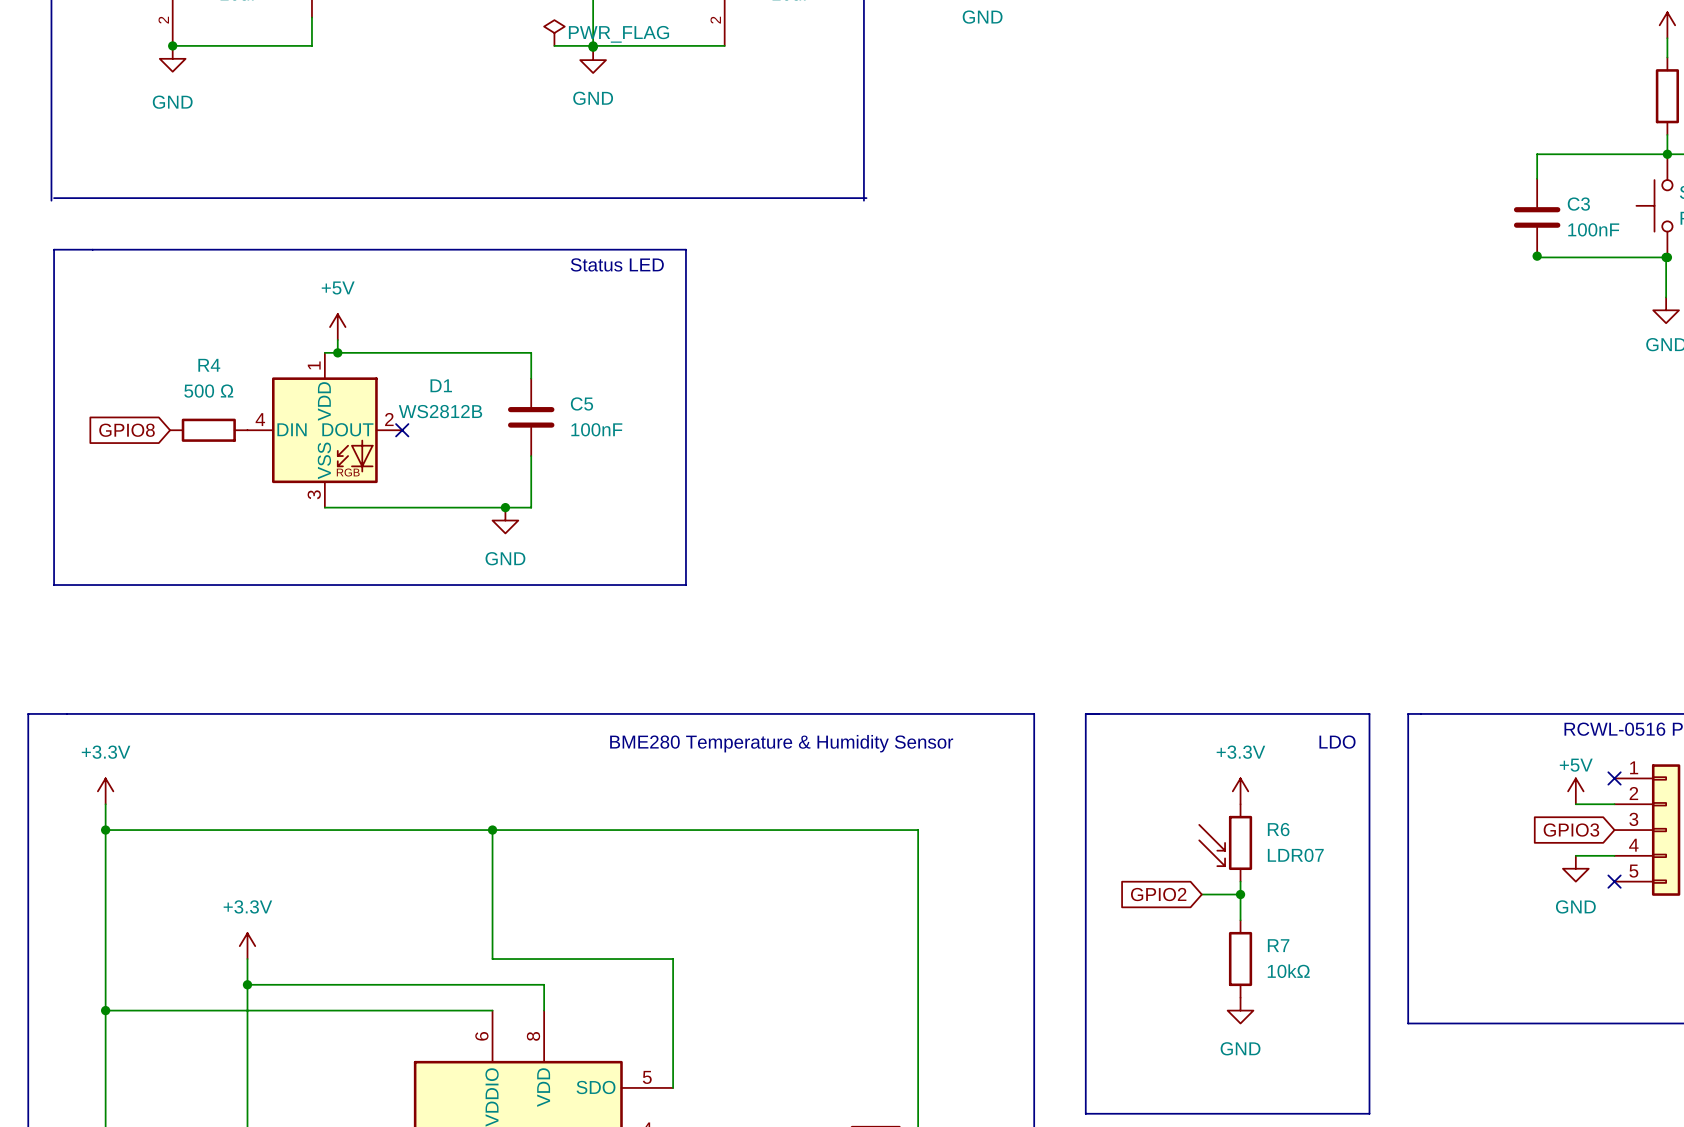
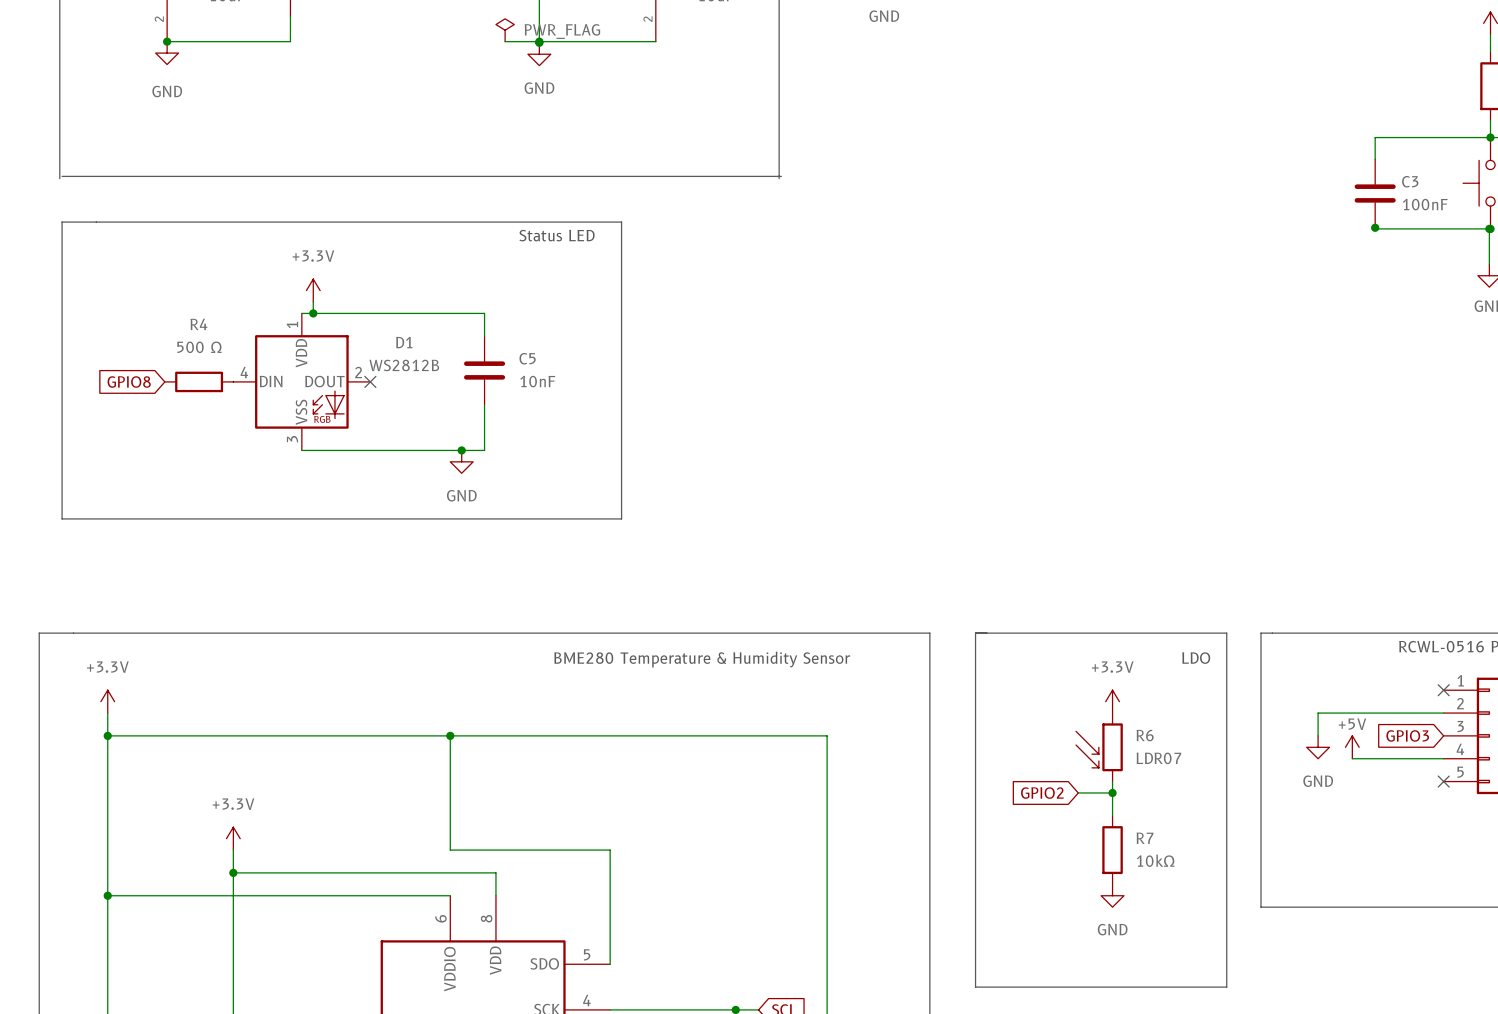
power symbol: +5V (337, 327) -> +3.3V (313, 290)
C5 value: 100nF (596, 429) -> 10nF (537, 381)
power symbol position: +5V (1575, 791) -> +5V (1352, 747)
wire: none -> (1409, 713) (1318, 713) (1318, 735)
wire: none -> (1352, 758) (1409, 758)
power symbol position: GND (1575, 868) -> GND (1318, 747)

